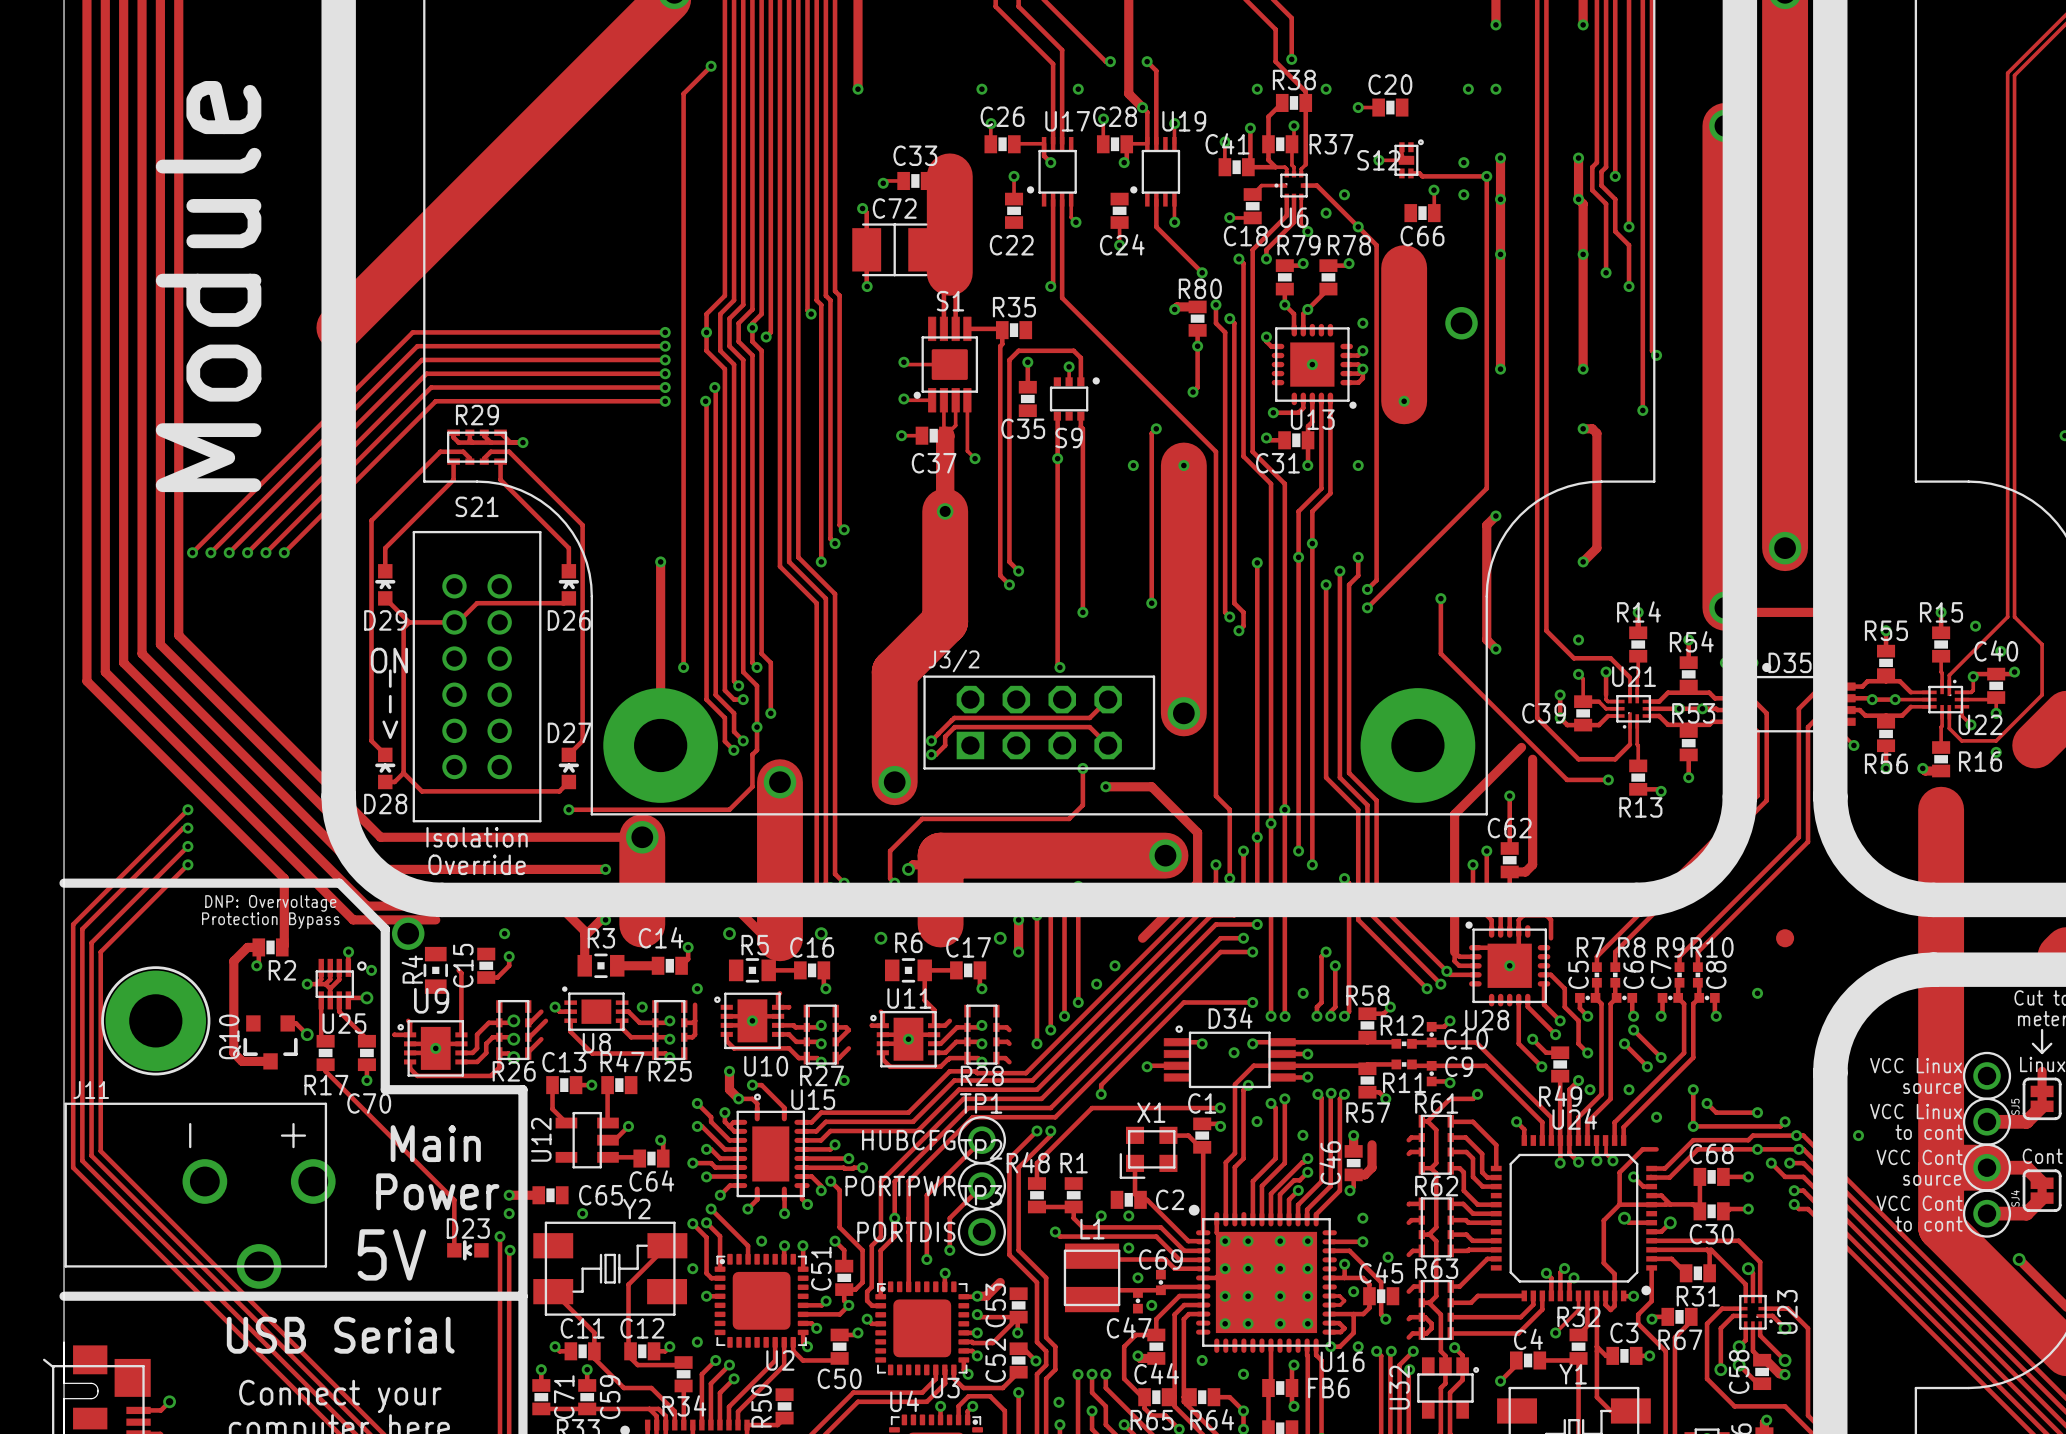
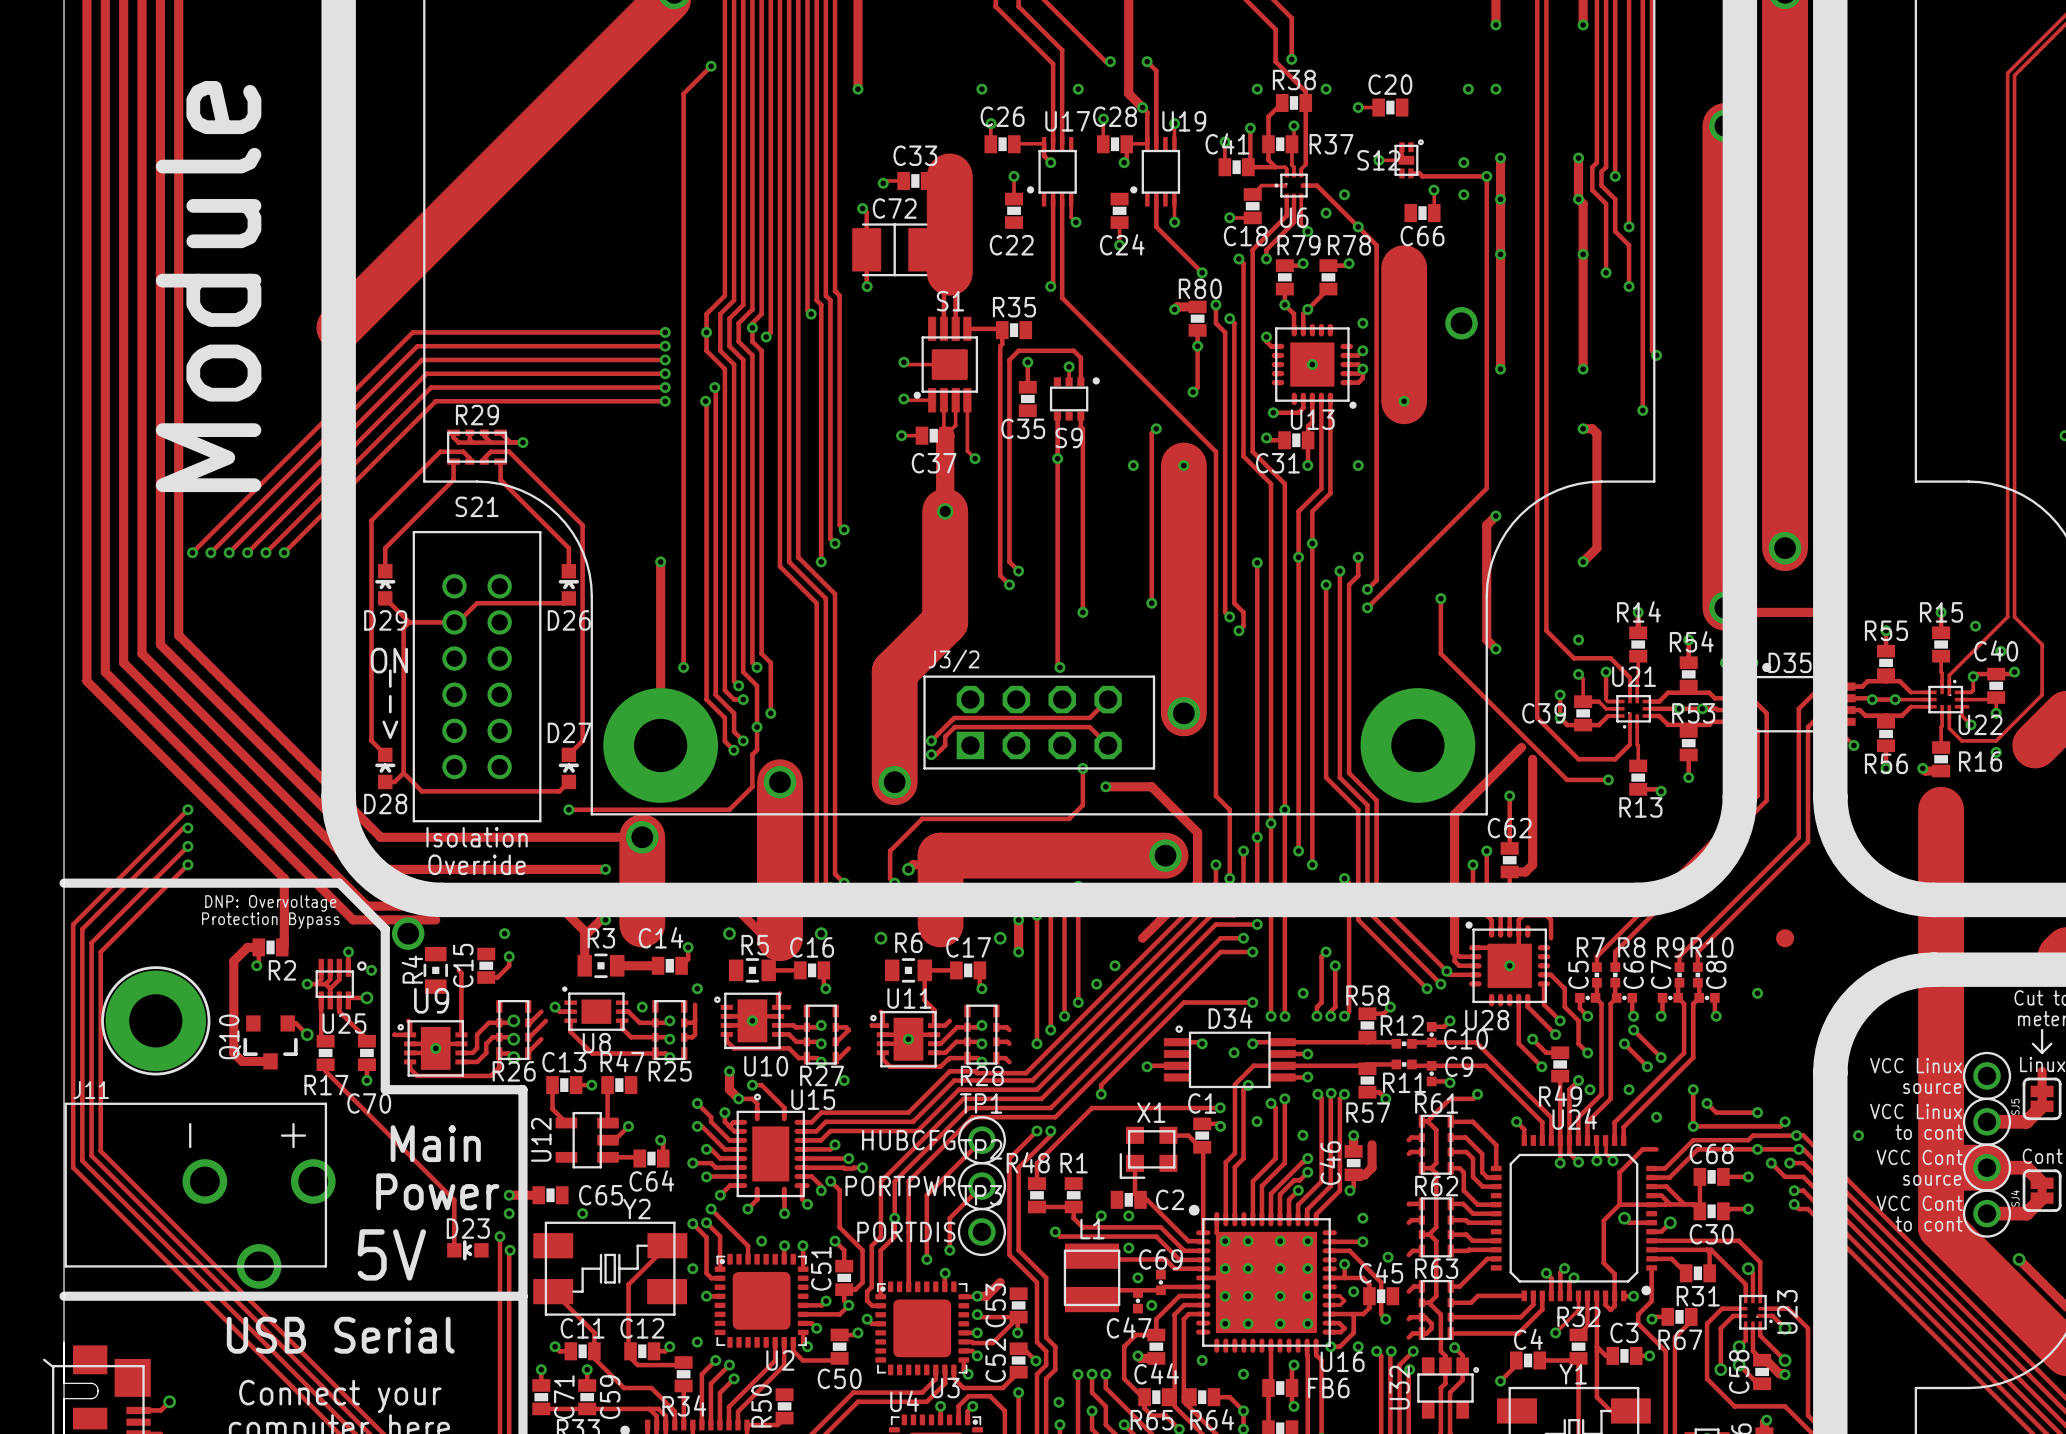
track: (1633, 1176) (1643, 1186) (1651, 1186) -> (1684, 1204) (1666, 1186) (1651, 1186)
via: (1633, 1176) -> none

